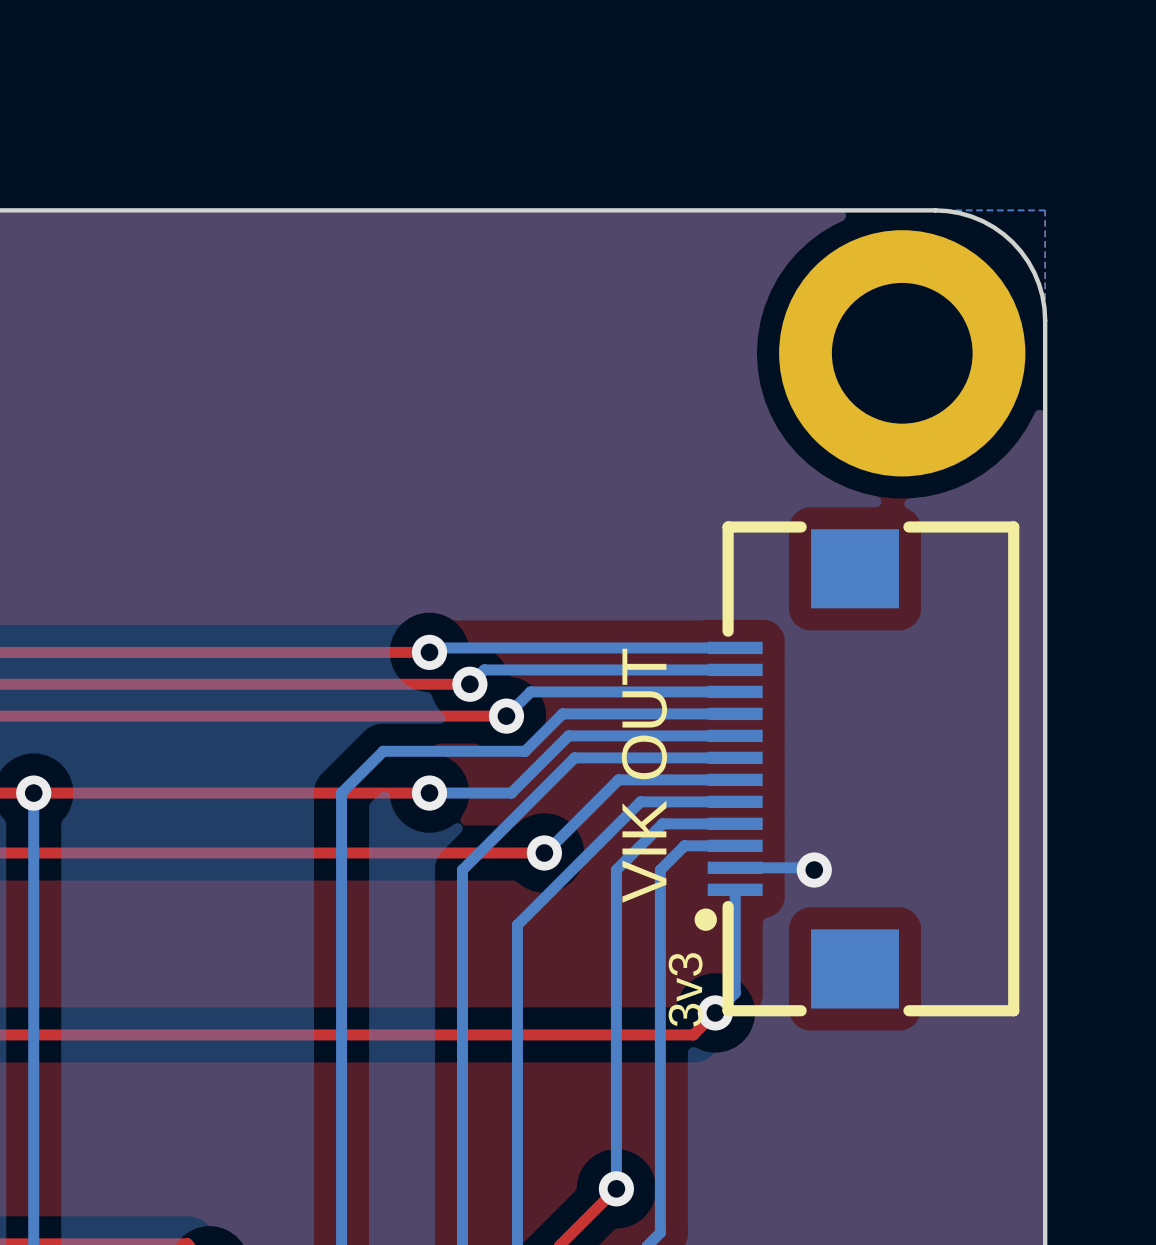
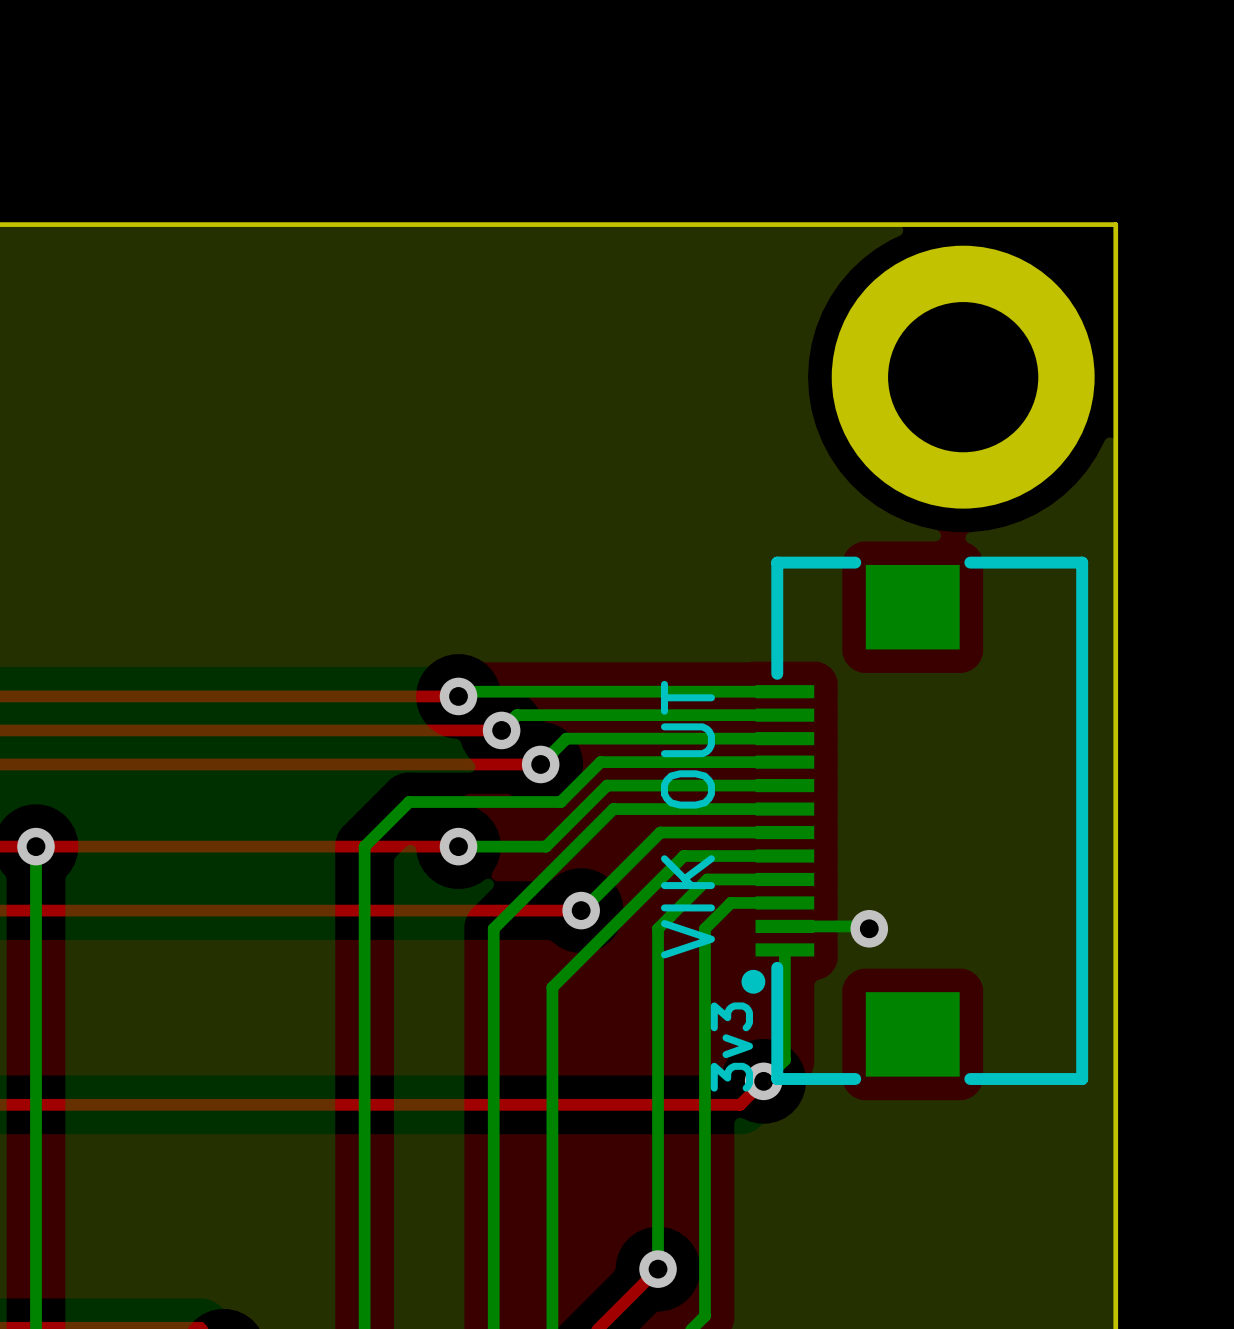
board edge: (935, 210) (971, 216) (993, 227) (1012, 242) (1034, 272) (1042, 295) (1045, 320) -> (998, 224) (1115, 224) (1115, 341)

